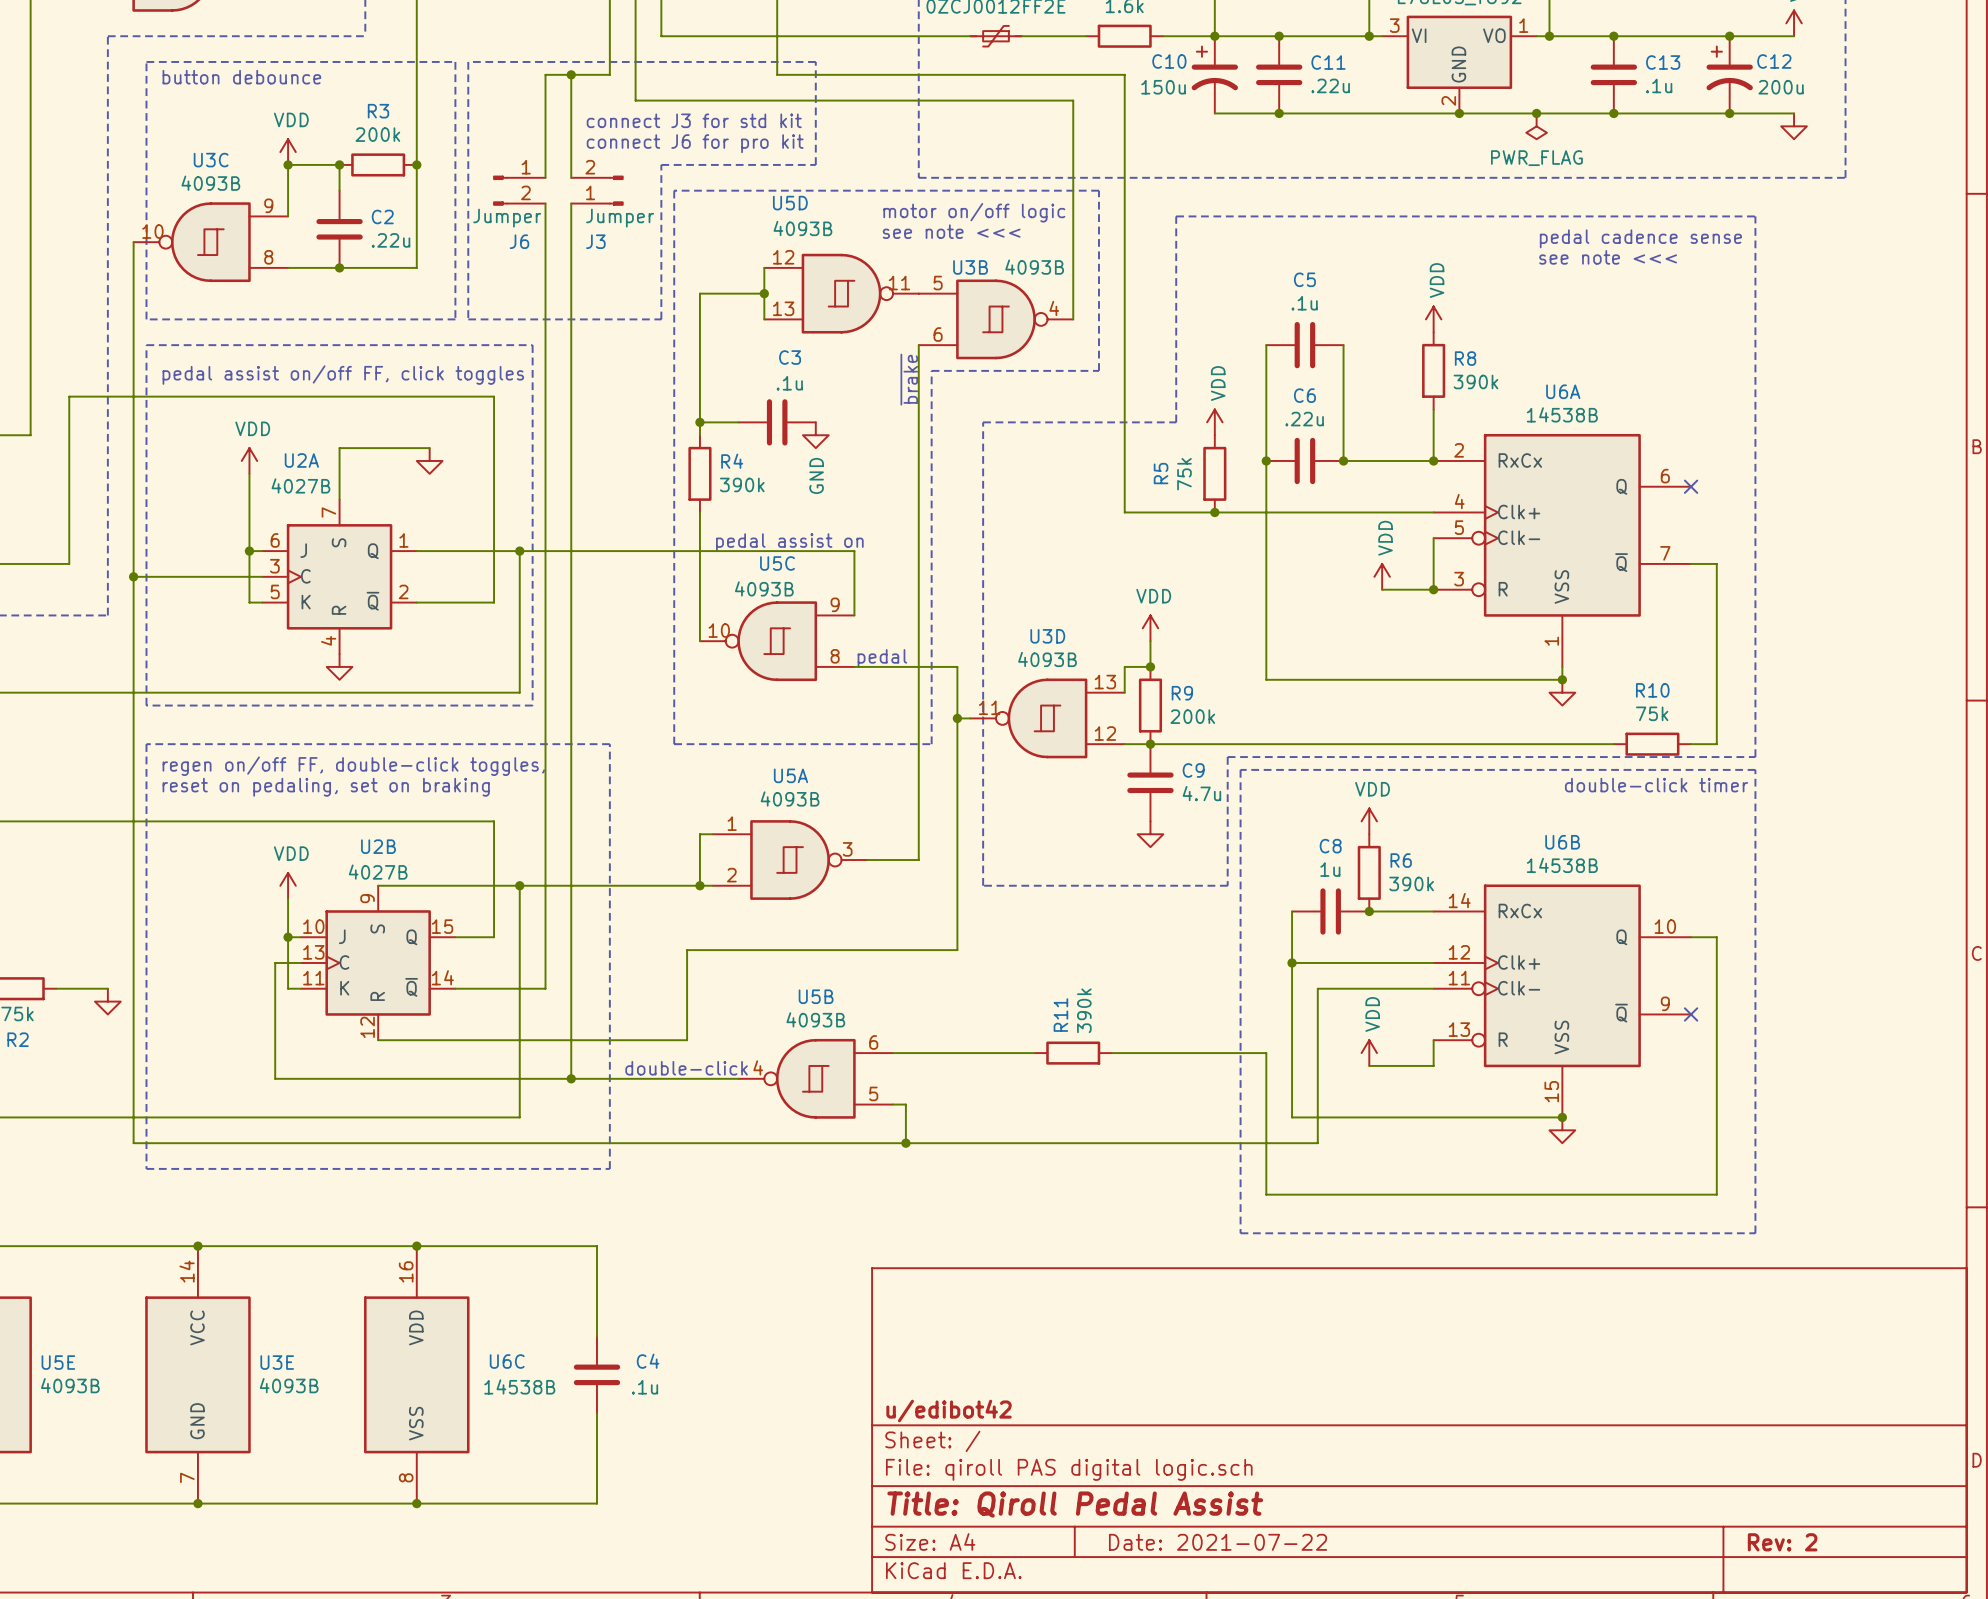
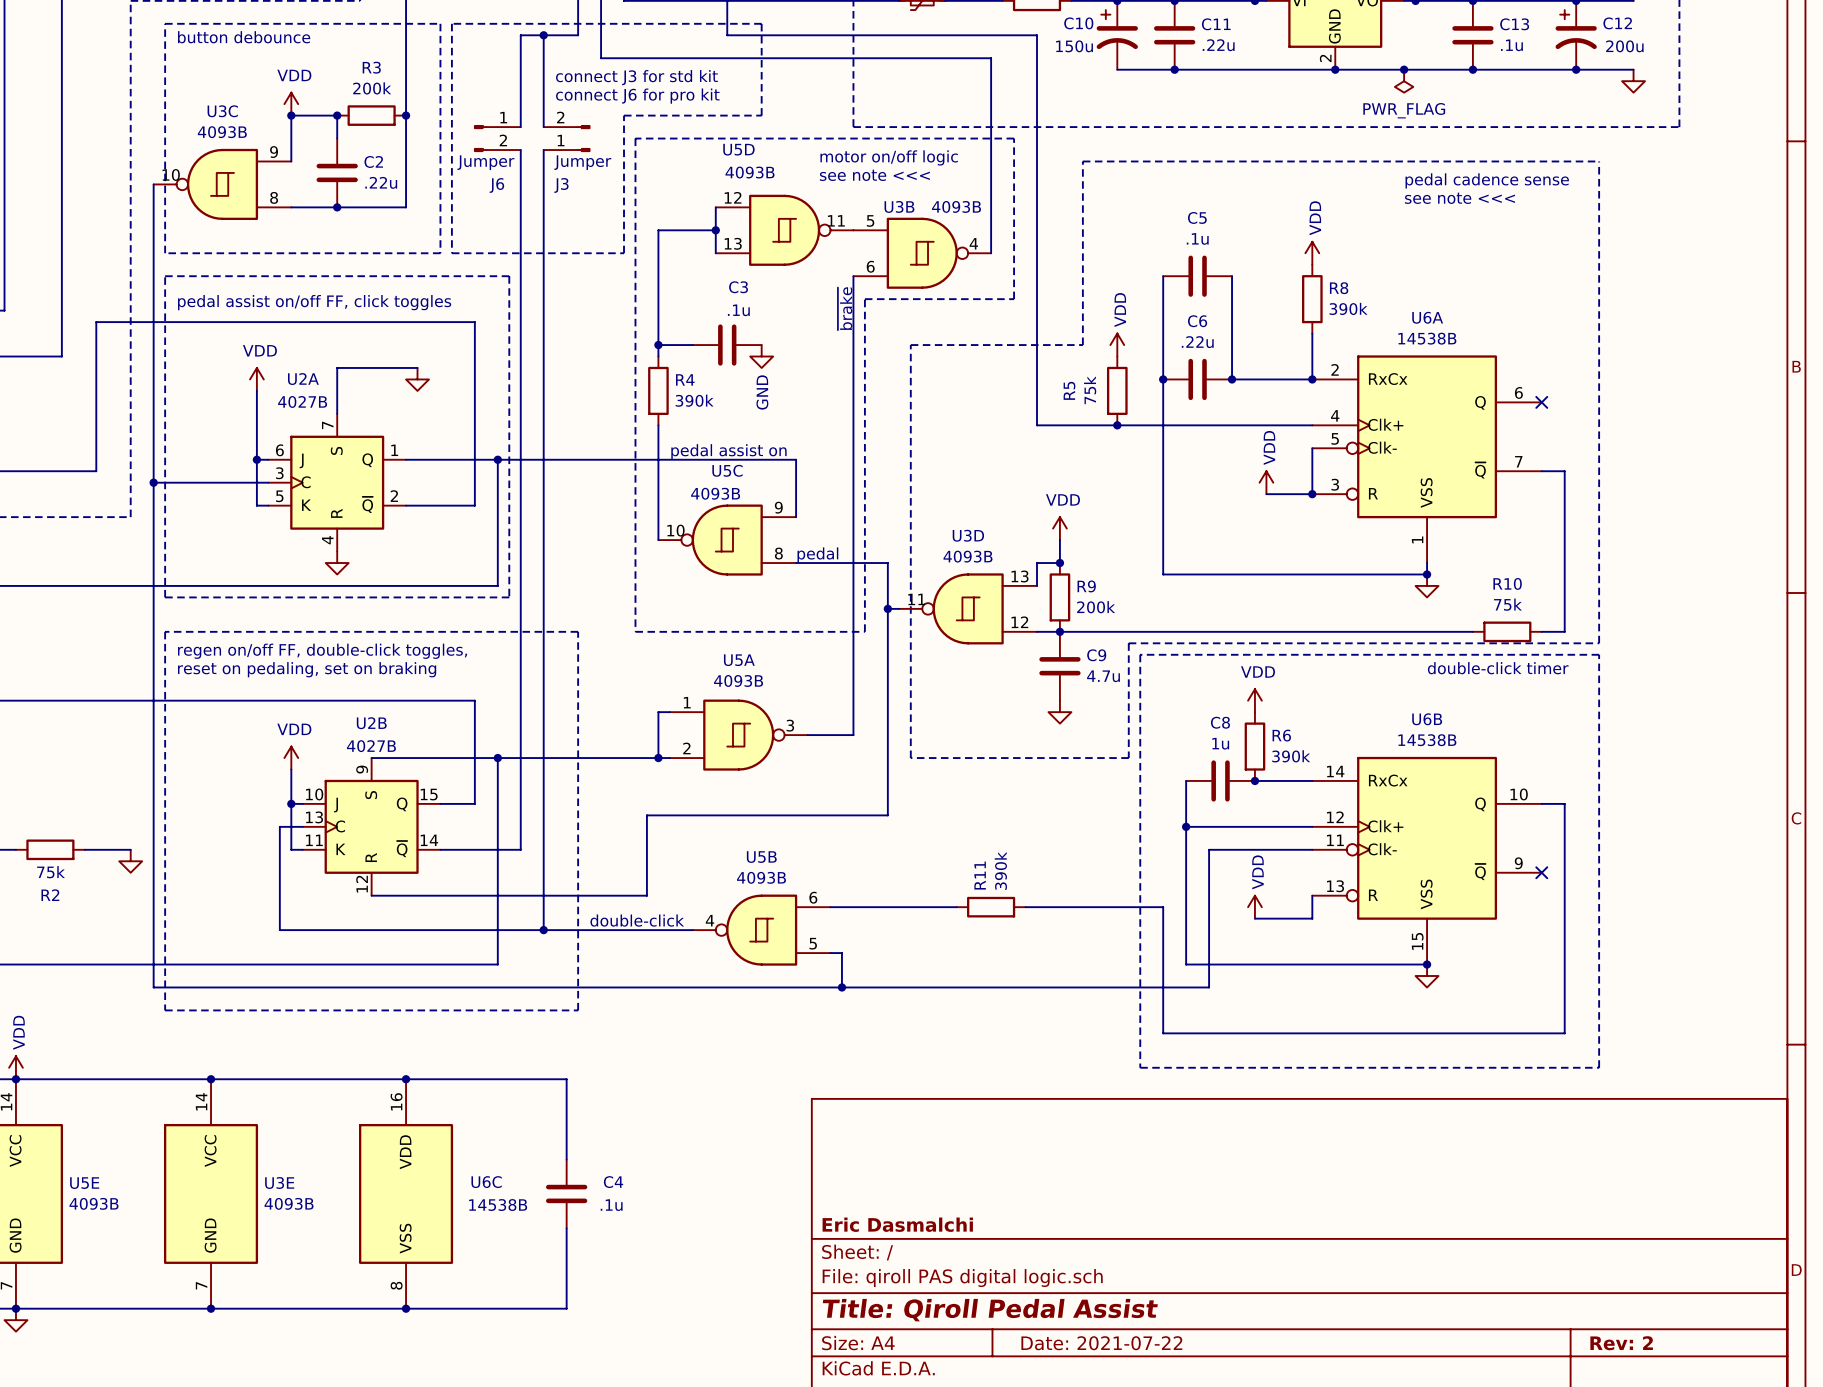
title block: u/edibot42 (949, 1410) -> Eric Dasmalchi (897, 1224)

